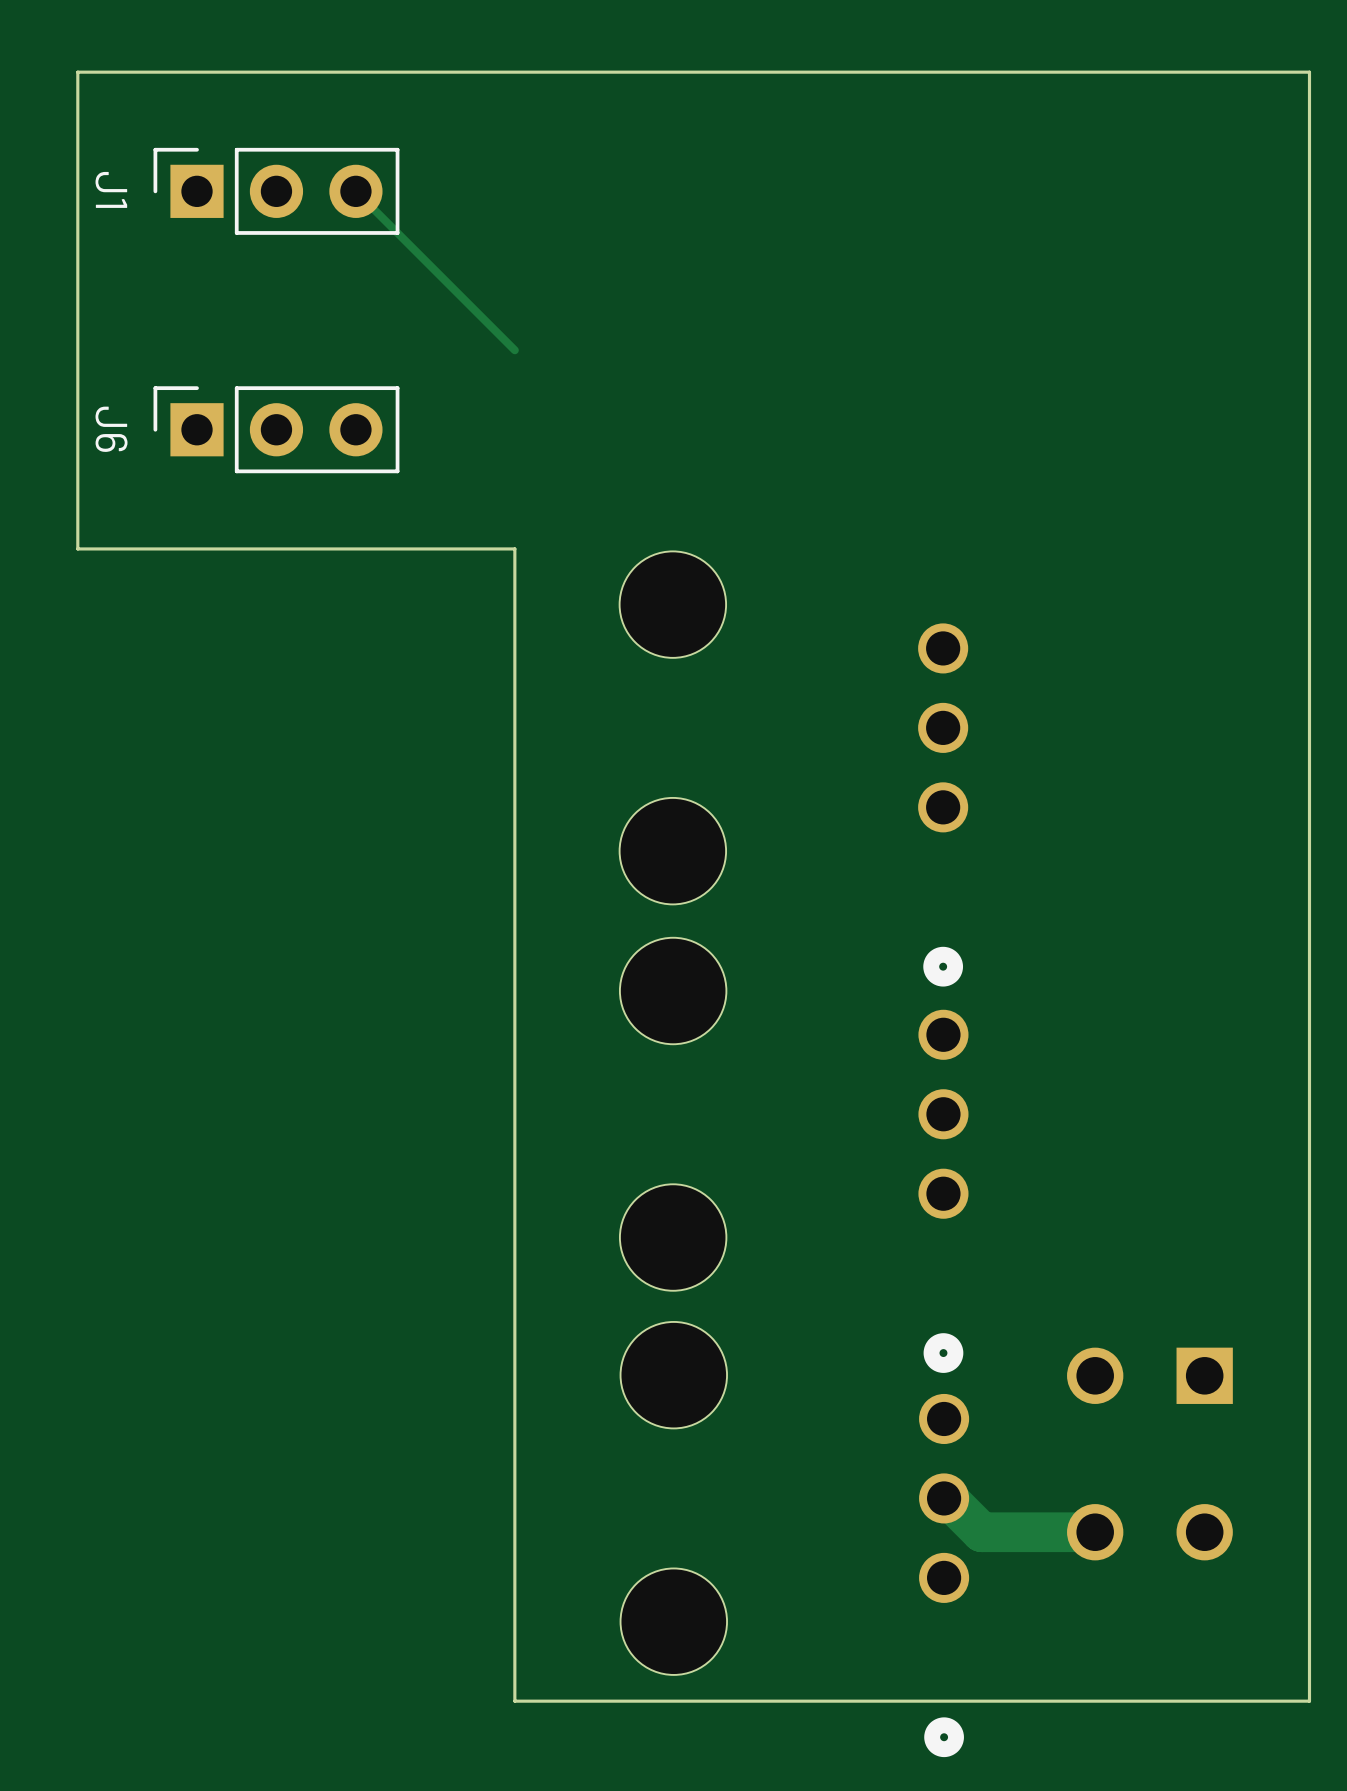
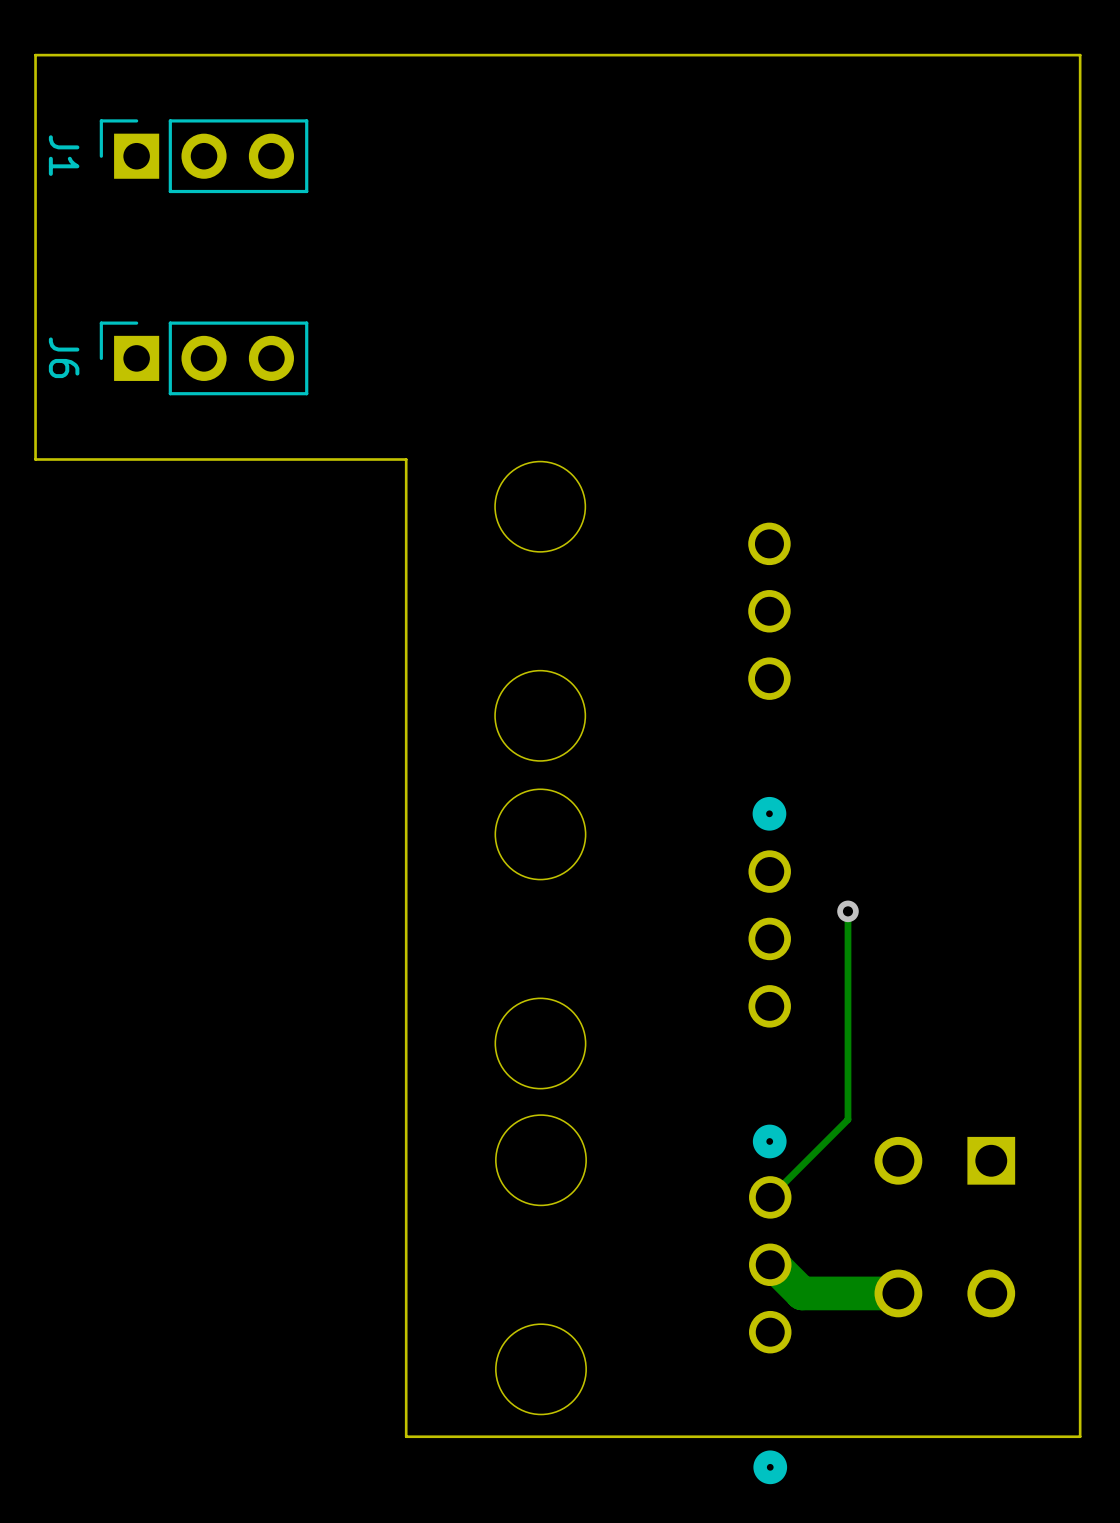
track: (355, 191) (514, 350) -> none
track: none -> (847, 911) (847, 1119) (770, 1197)
via: none -> (847, 911)

